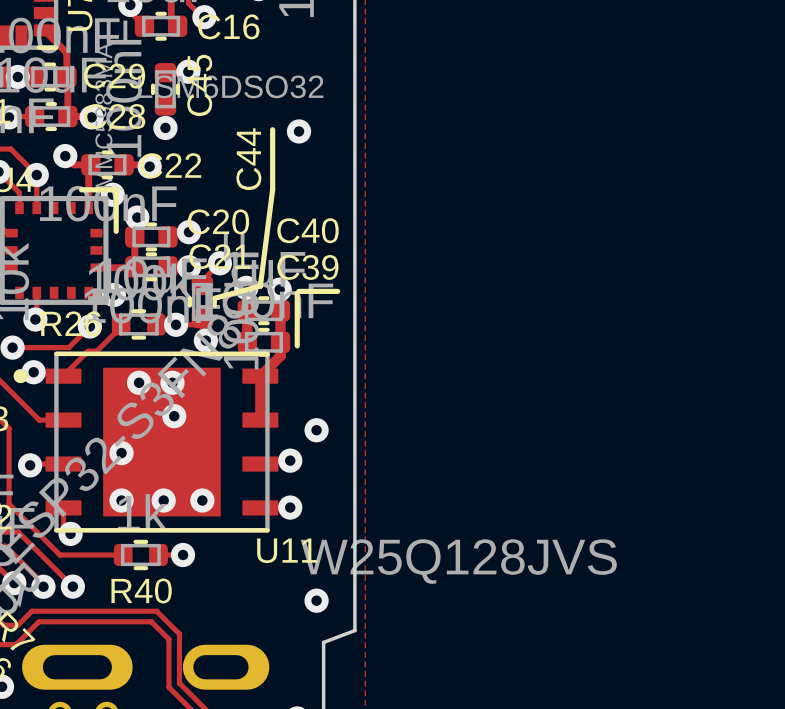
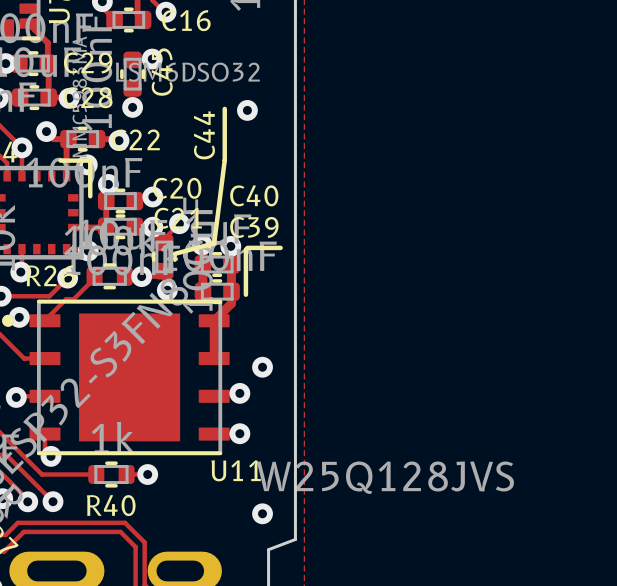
via: (139, 382) -> none
via: (172, 382) -> none
via: (174, 416) -> none
via: (121, 453) -> none
via: (121, 500) -> none
via: (163, 500) -> none
via: (202, 500) -> none

